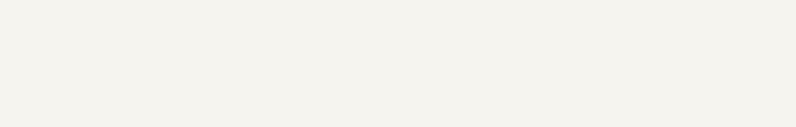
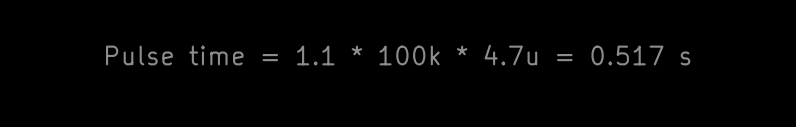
text: none -> Pulse time = 1.1 * 100k * 4.7u = 0.517 s (398, 55)

